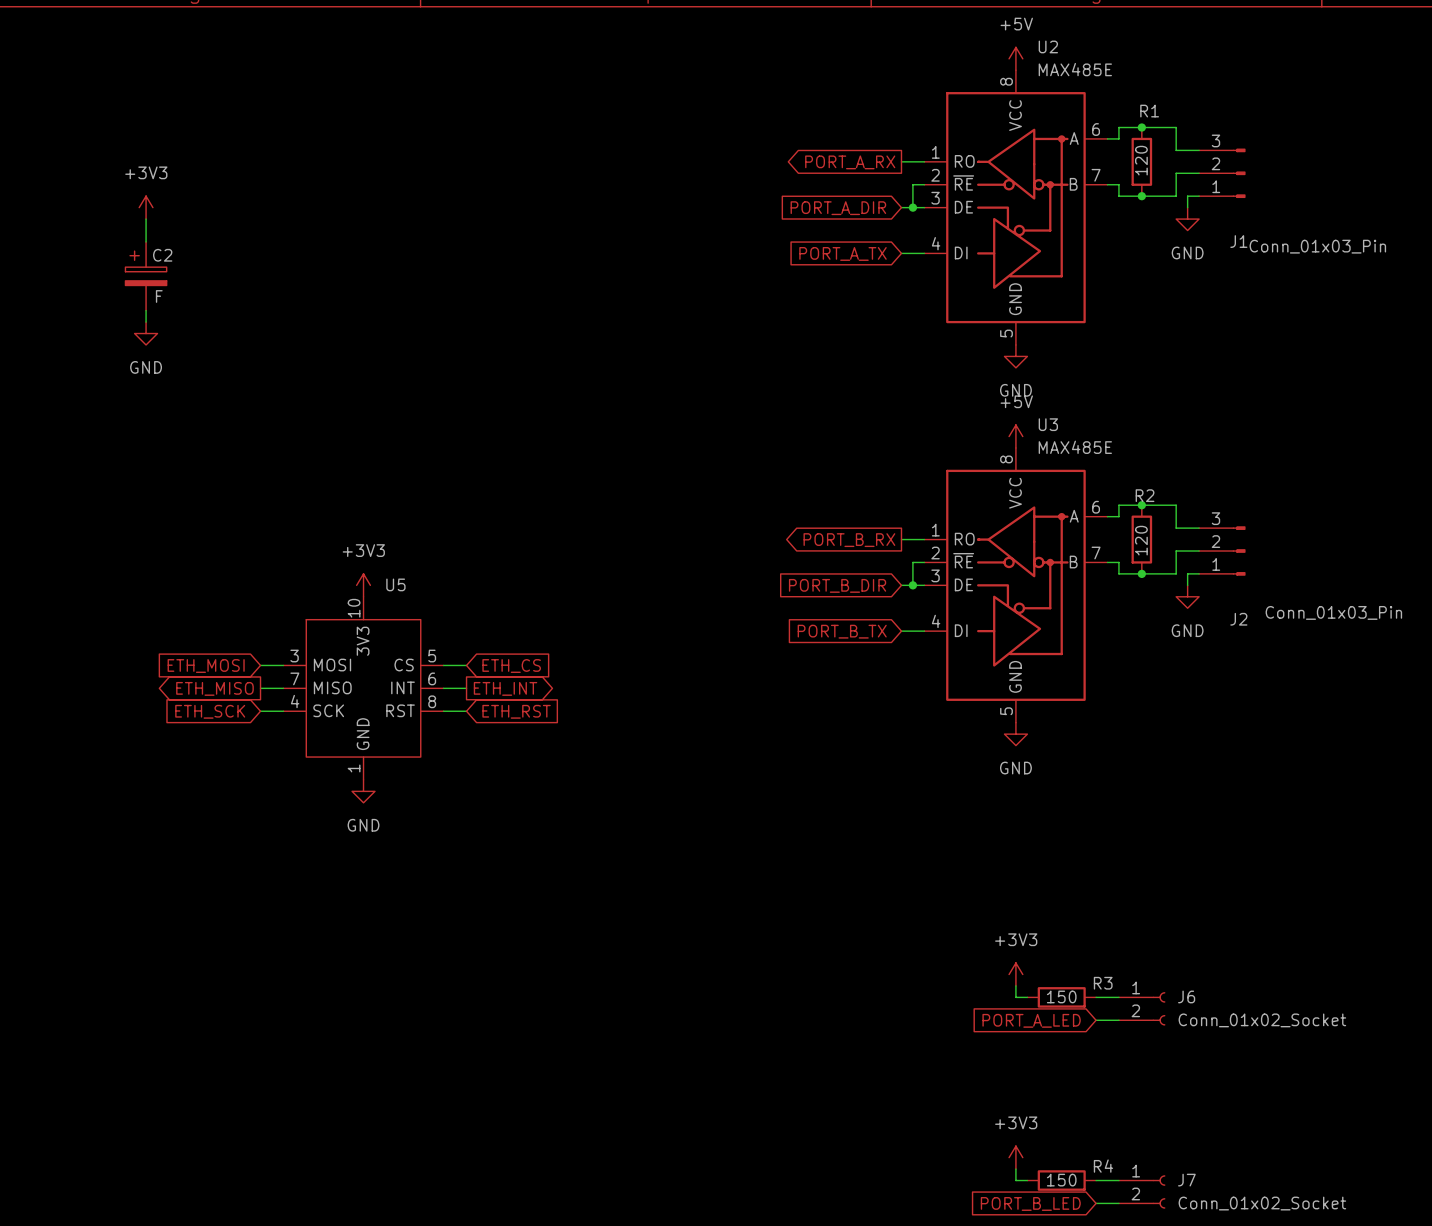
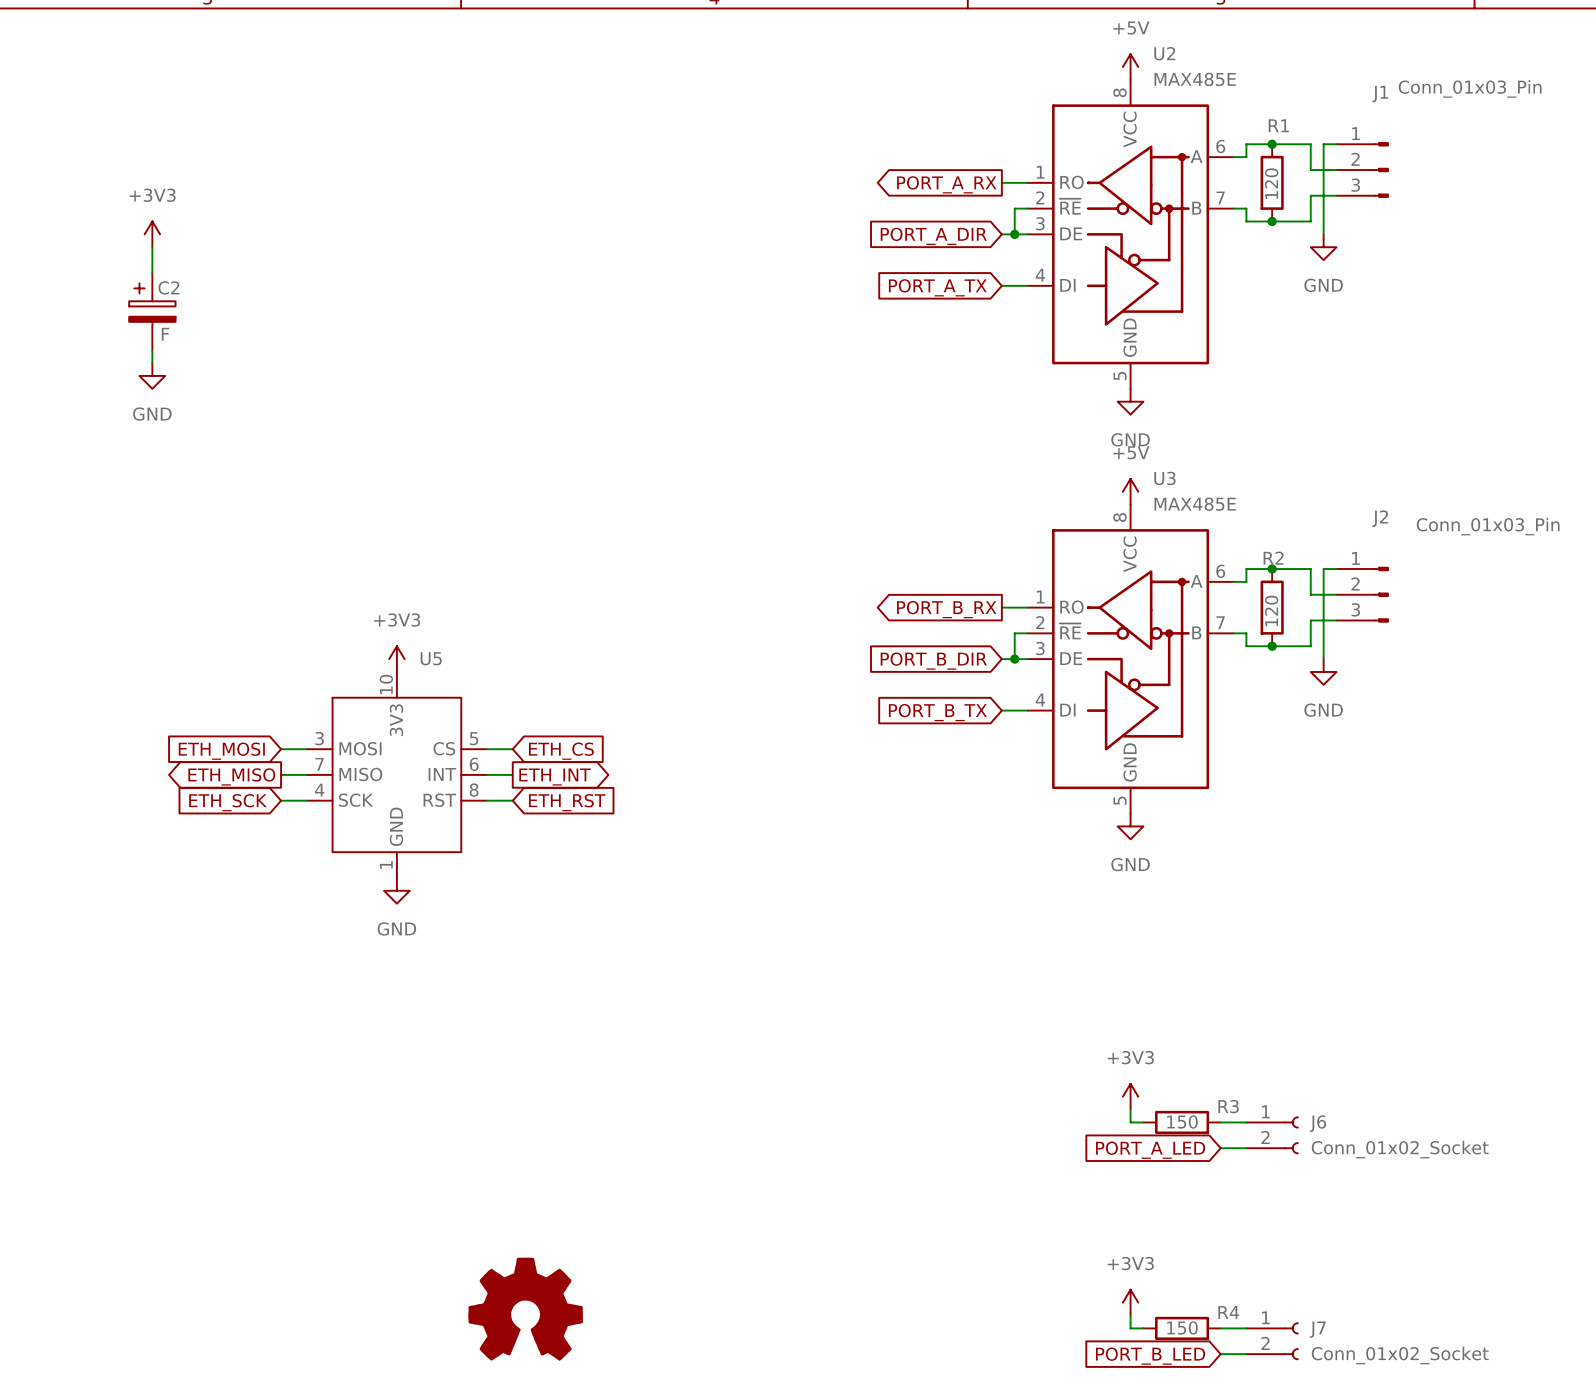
J1 flip: as is (1239, 173) -> up-down (1381, 170)
wire: (1187, 196) (1199, 196) -> (1323, 221) (1323, 144) (1336, 144)
J2 flip: as is (1239, 551) -> up-down (1381, 594)
wire: (1187, 573) (1199, 573) -> (1323, 646) (1323, 569) (1336, 569)
part: none -> (525, 1309)

